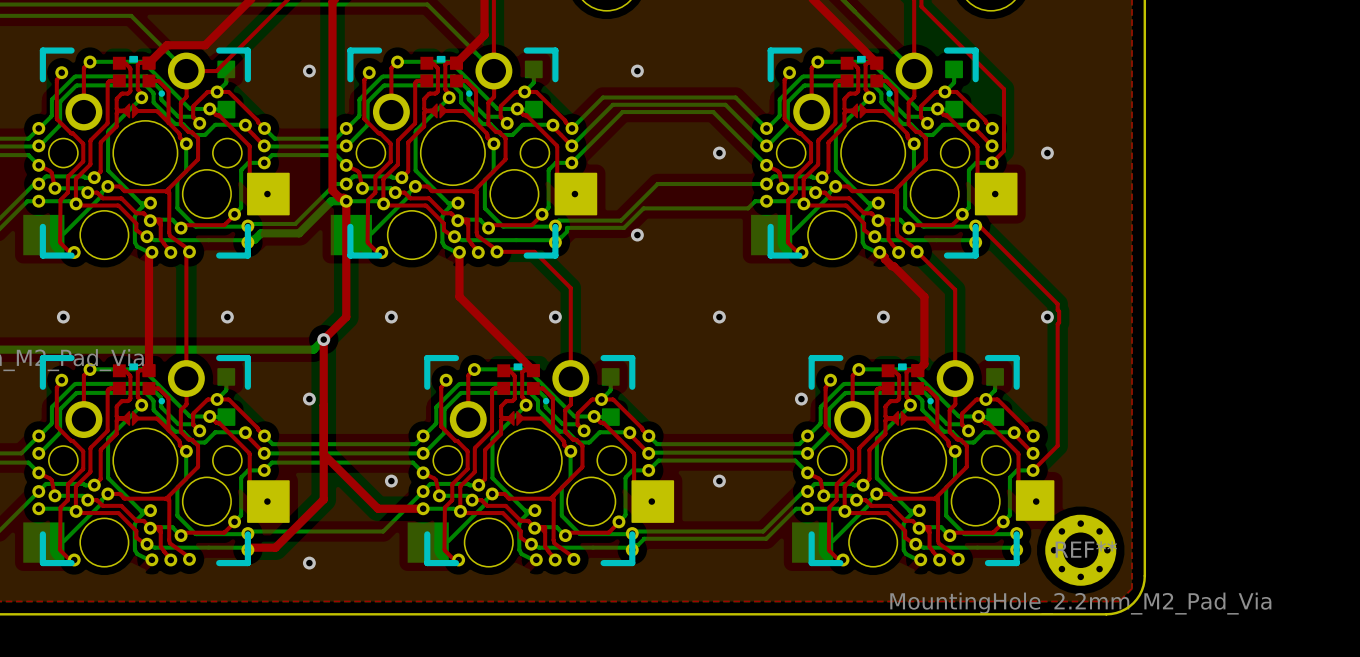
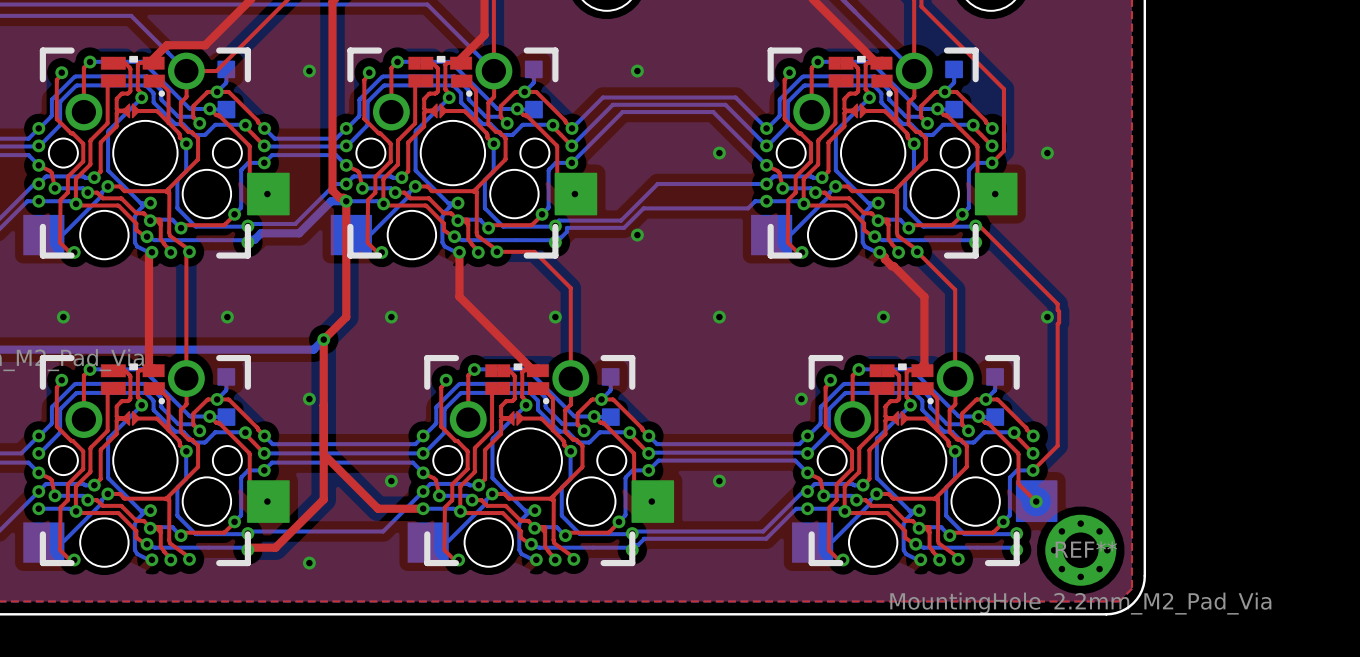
part footprint: [23, 47, 290, 260] -> [23, 47, 290, 260]
part footprint: [330, 47, 598, 260] -> [330, 47, 598, 260]
part footprint: [751, 47, 1018, 260] -> [751, 47, 1018, 260]
part footprint: [23, 354, 290, 567] -> [23, 354, 290, 567]
part footprint: [407, 354, 675, 567] -> [407, 354, 675, 567]
part footprint: [792, 354, 1055, 567] -> [792, 354, 1058, 567]

